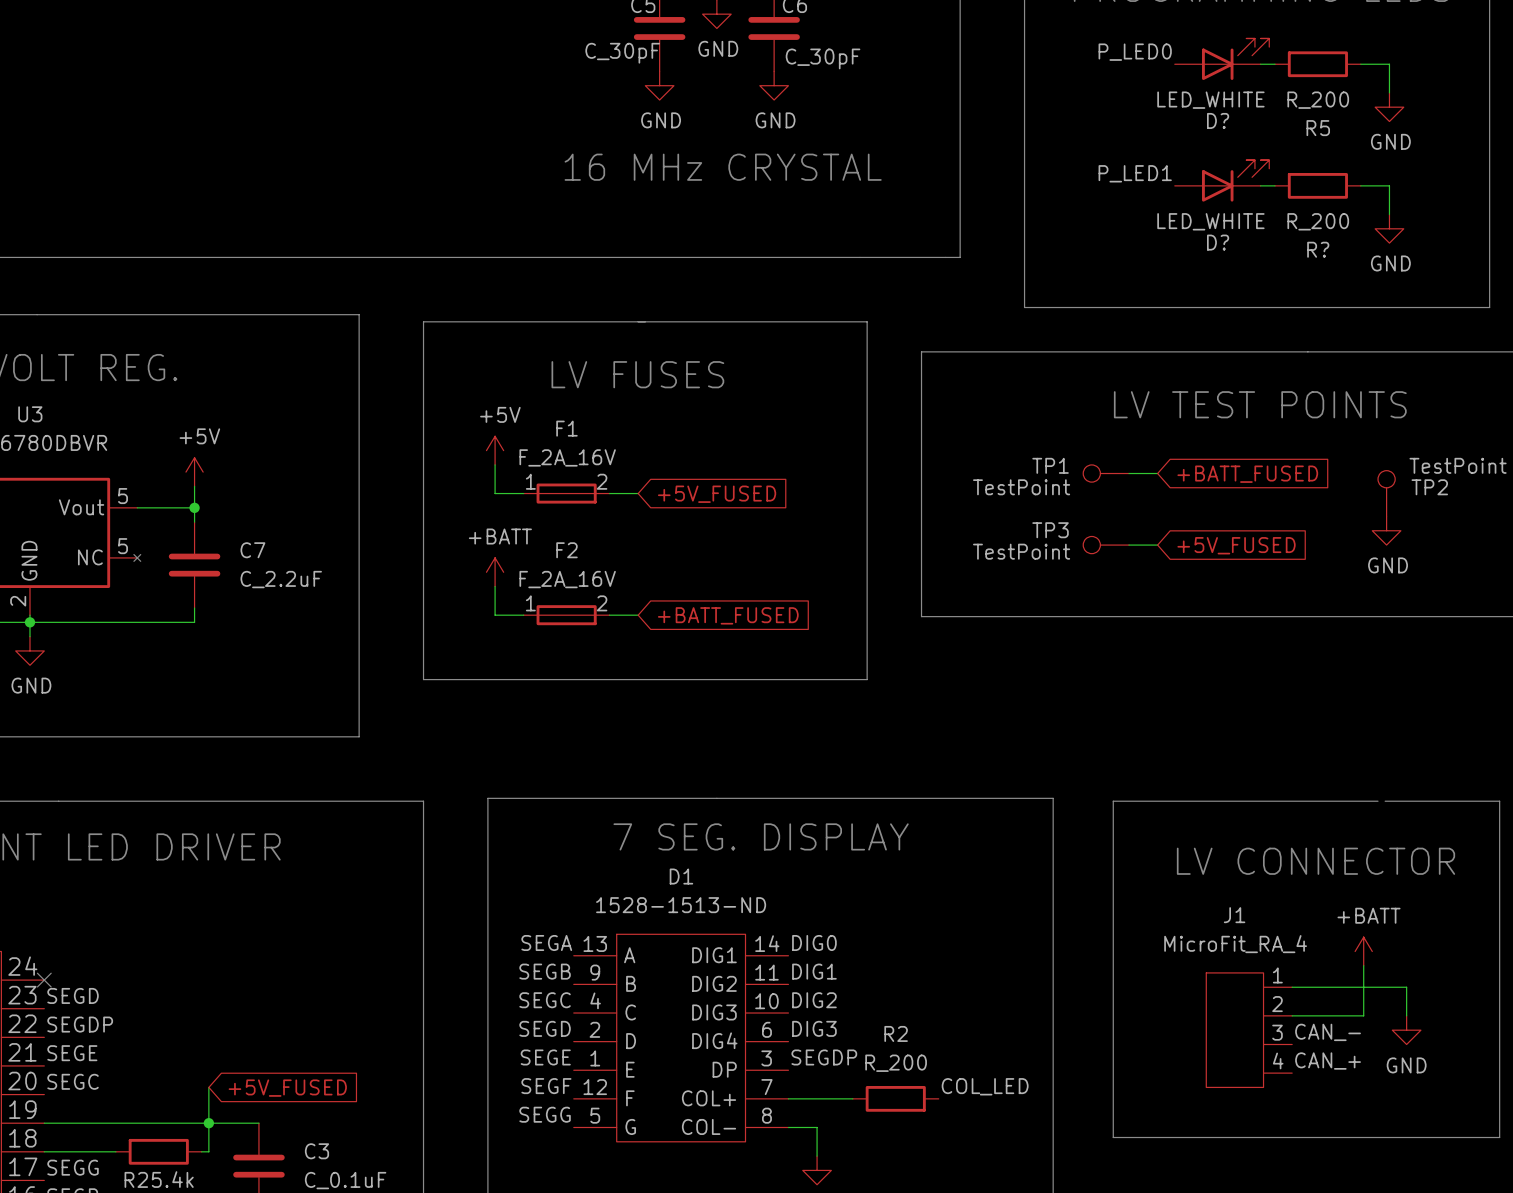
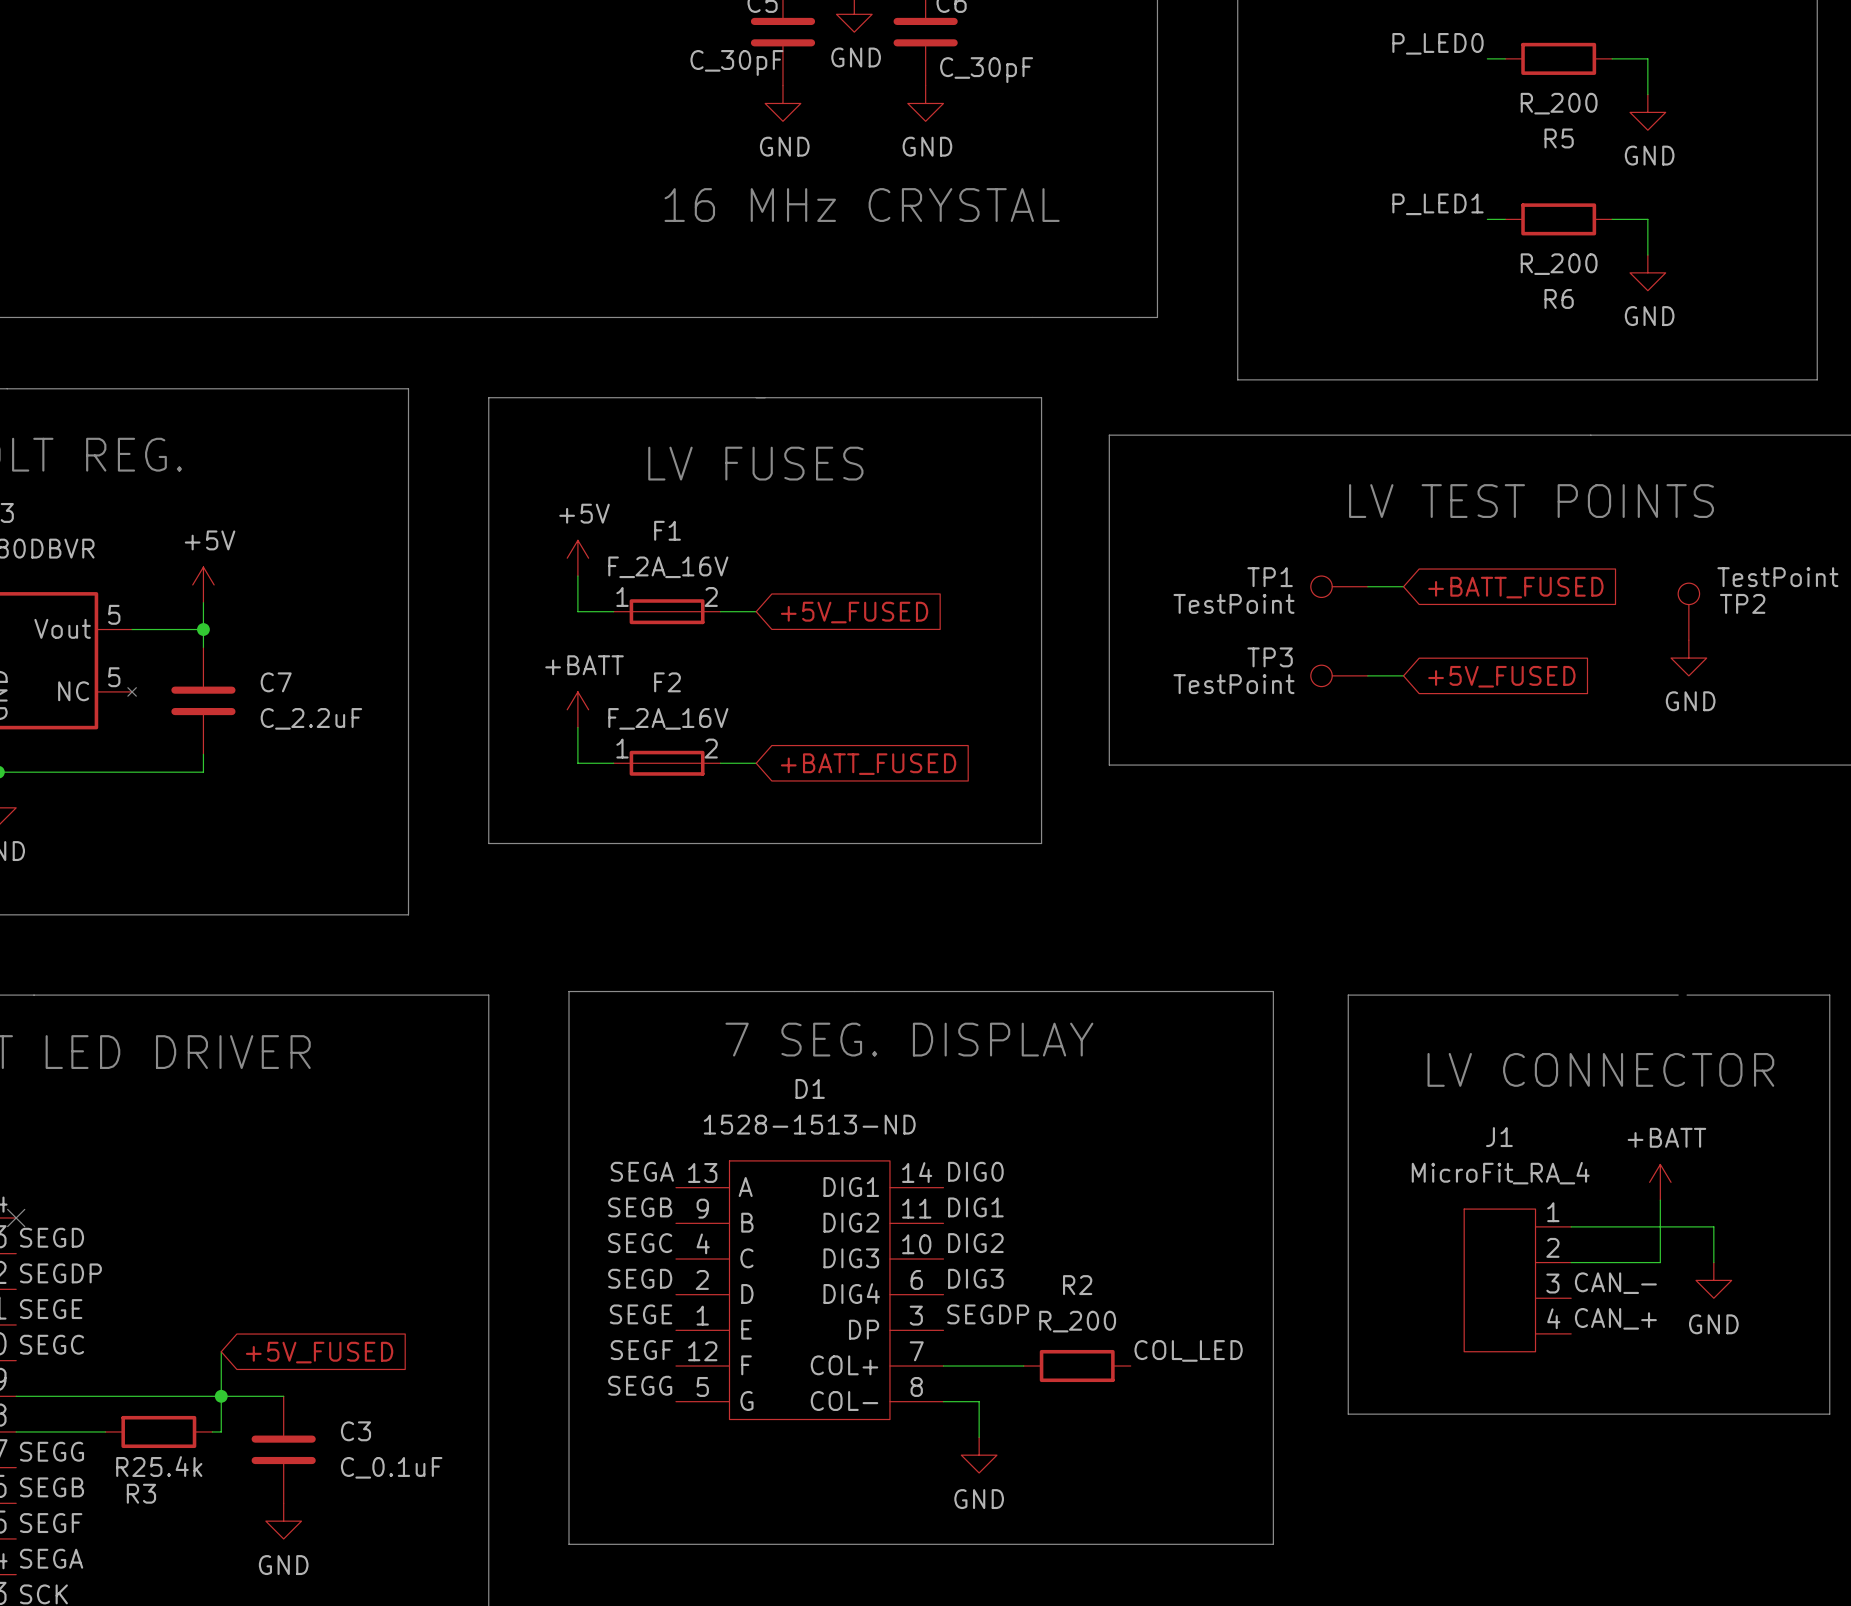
label position: P_LED0 (1135, 52) -> P_LED0 (1437, 43)
D?: LED_WHITE (1222, 59) -> none
wire: (1260, 64) (1274, 64) -> (1487, 58) (1505, 58)
R5 position: (1317, 64) -> (1558, 58)
wire: (1360, 64) (1389, 64) (1389, 92) -> (1612, 58) (1647, 58) (1647, 94)
power symbol position: GND (1389, 107) -> GND (1647, 112)
label position: P_LED1 (1135, 173) -> P_LED1 (1437, 204)
R6: none -> R_200 (1558, 219)
D?: LED_WHITE (1222, 180) -> none
wire: (1260, 185) (1274, 185) -> (1487, 219) (1505, 219)
R?: R_200 (1317, 185) -> none
wire: (1360, 185) (1389, 185) (1389, 214) -> (1612, 219) (1647, 219) (1647, 255)
power symbol position: GND (1389, 228) -> GND (1647, 272)

